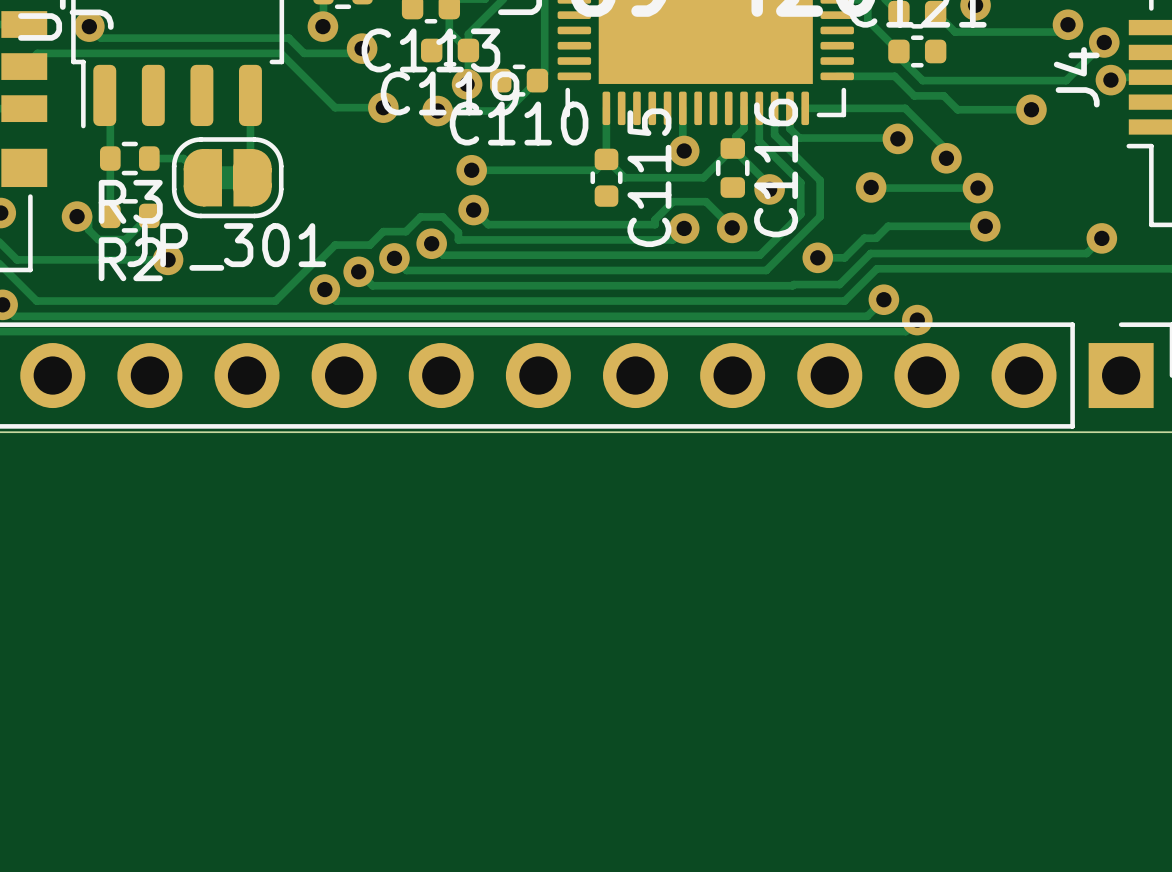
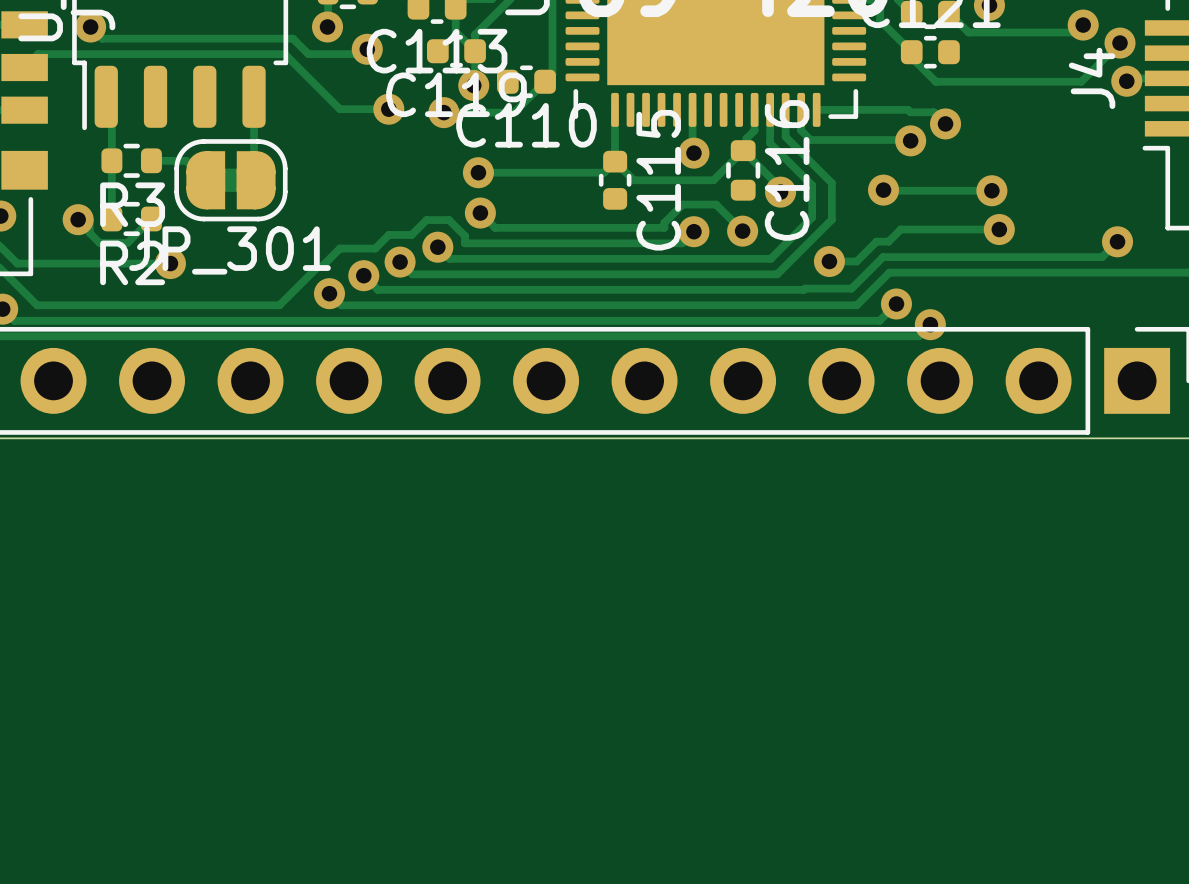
track: (837, 76) (894, 76) (914, 95) (943, 95) (957, 109) (1031, 109) -> none
track: (895, 108) (905, 108) (946, 149) (946, 158) -> (908, 109) (910, 112) (933, 112) (945, 123)
via: (1031, 109) -> none
via position: (946, 158) -> (945, 123)

